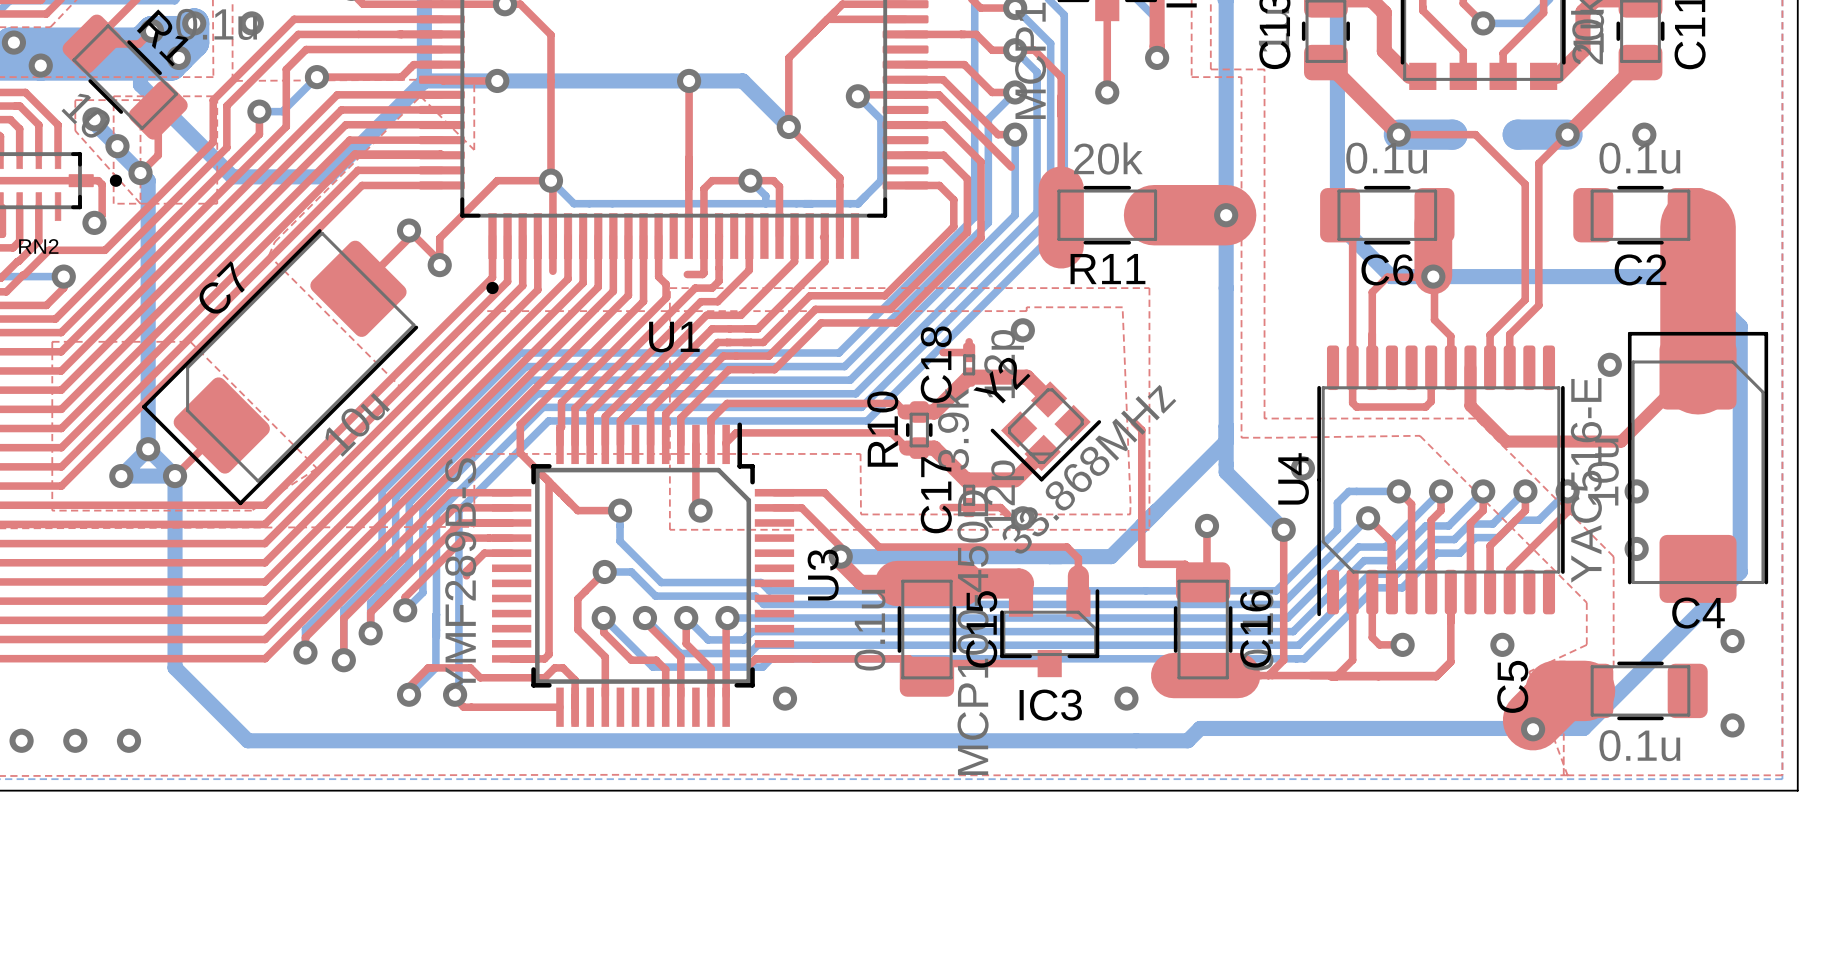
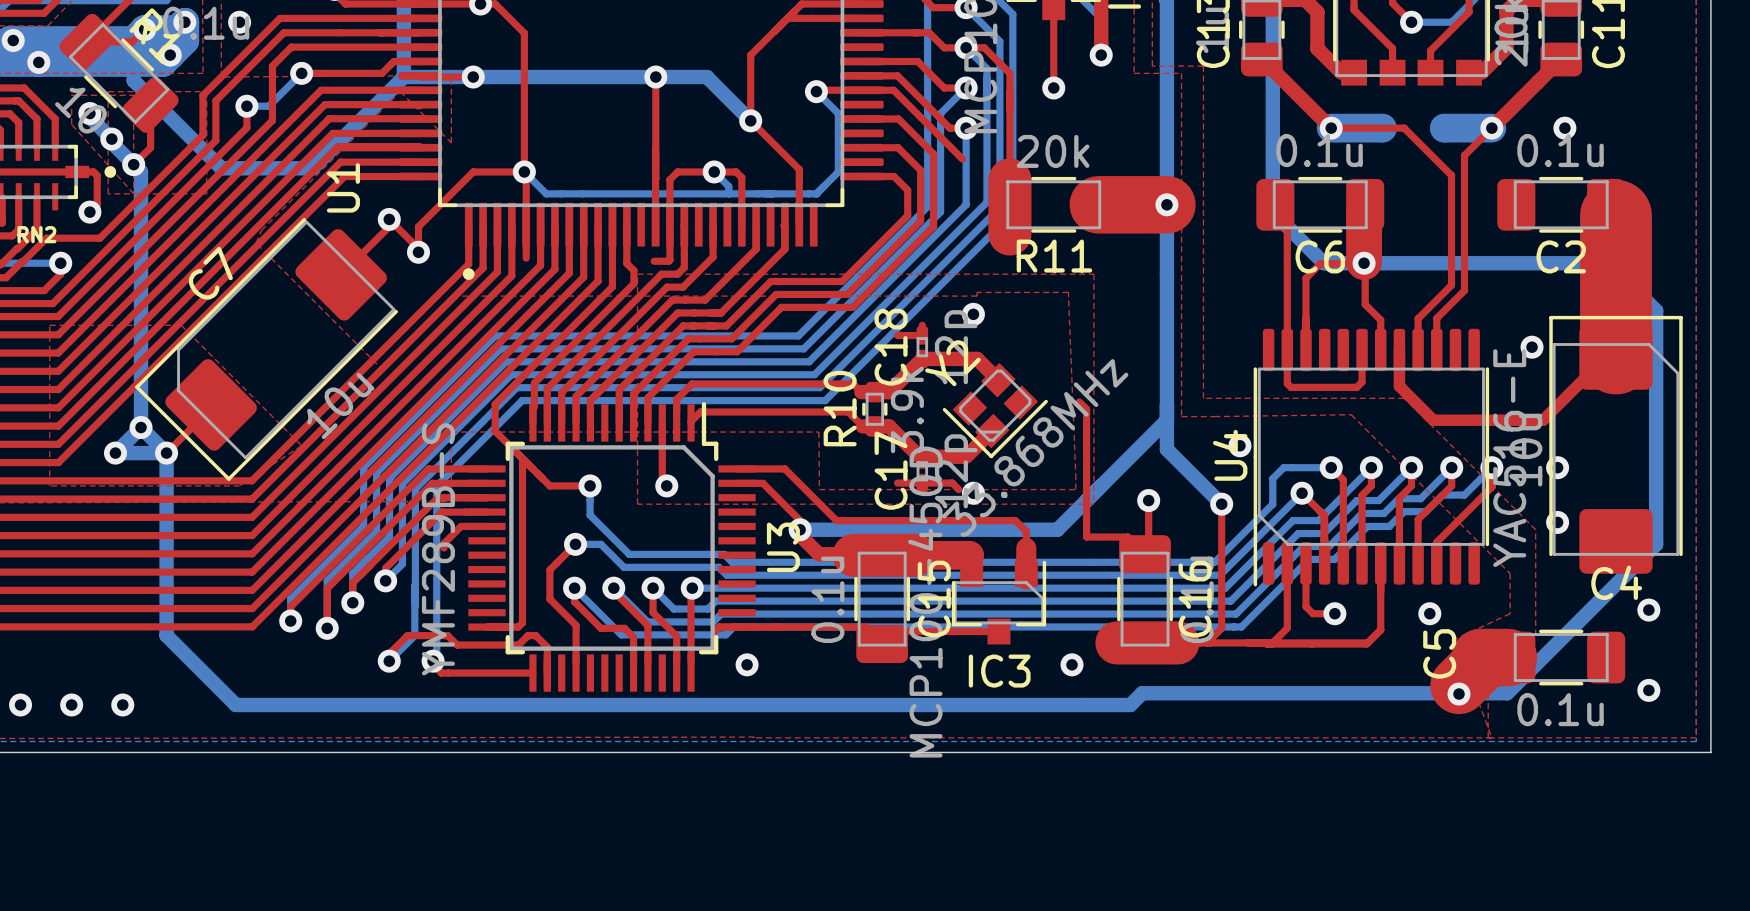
U1 name rotation: 0° (674, 337) -> 90° counterclockwise (343, 187)
U1 name position: U1 (674, 337) -> U1 (343, 187)

